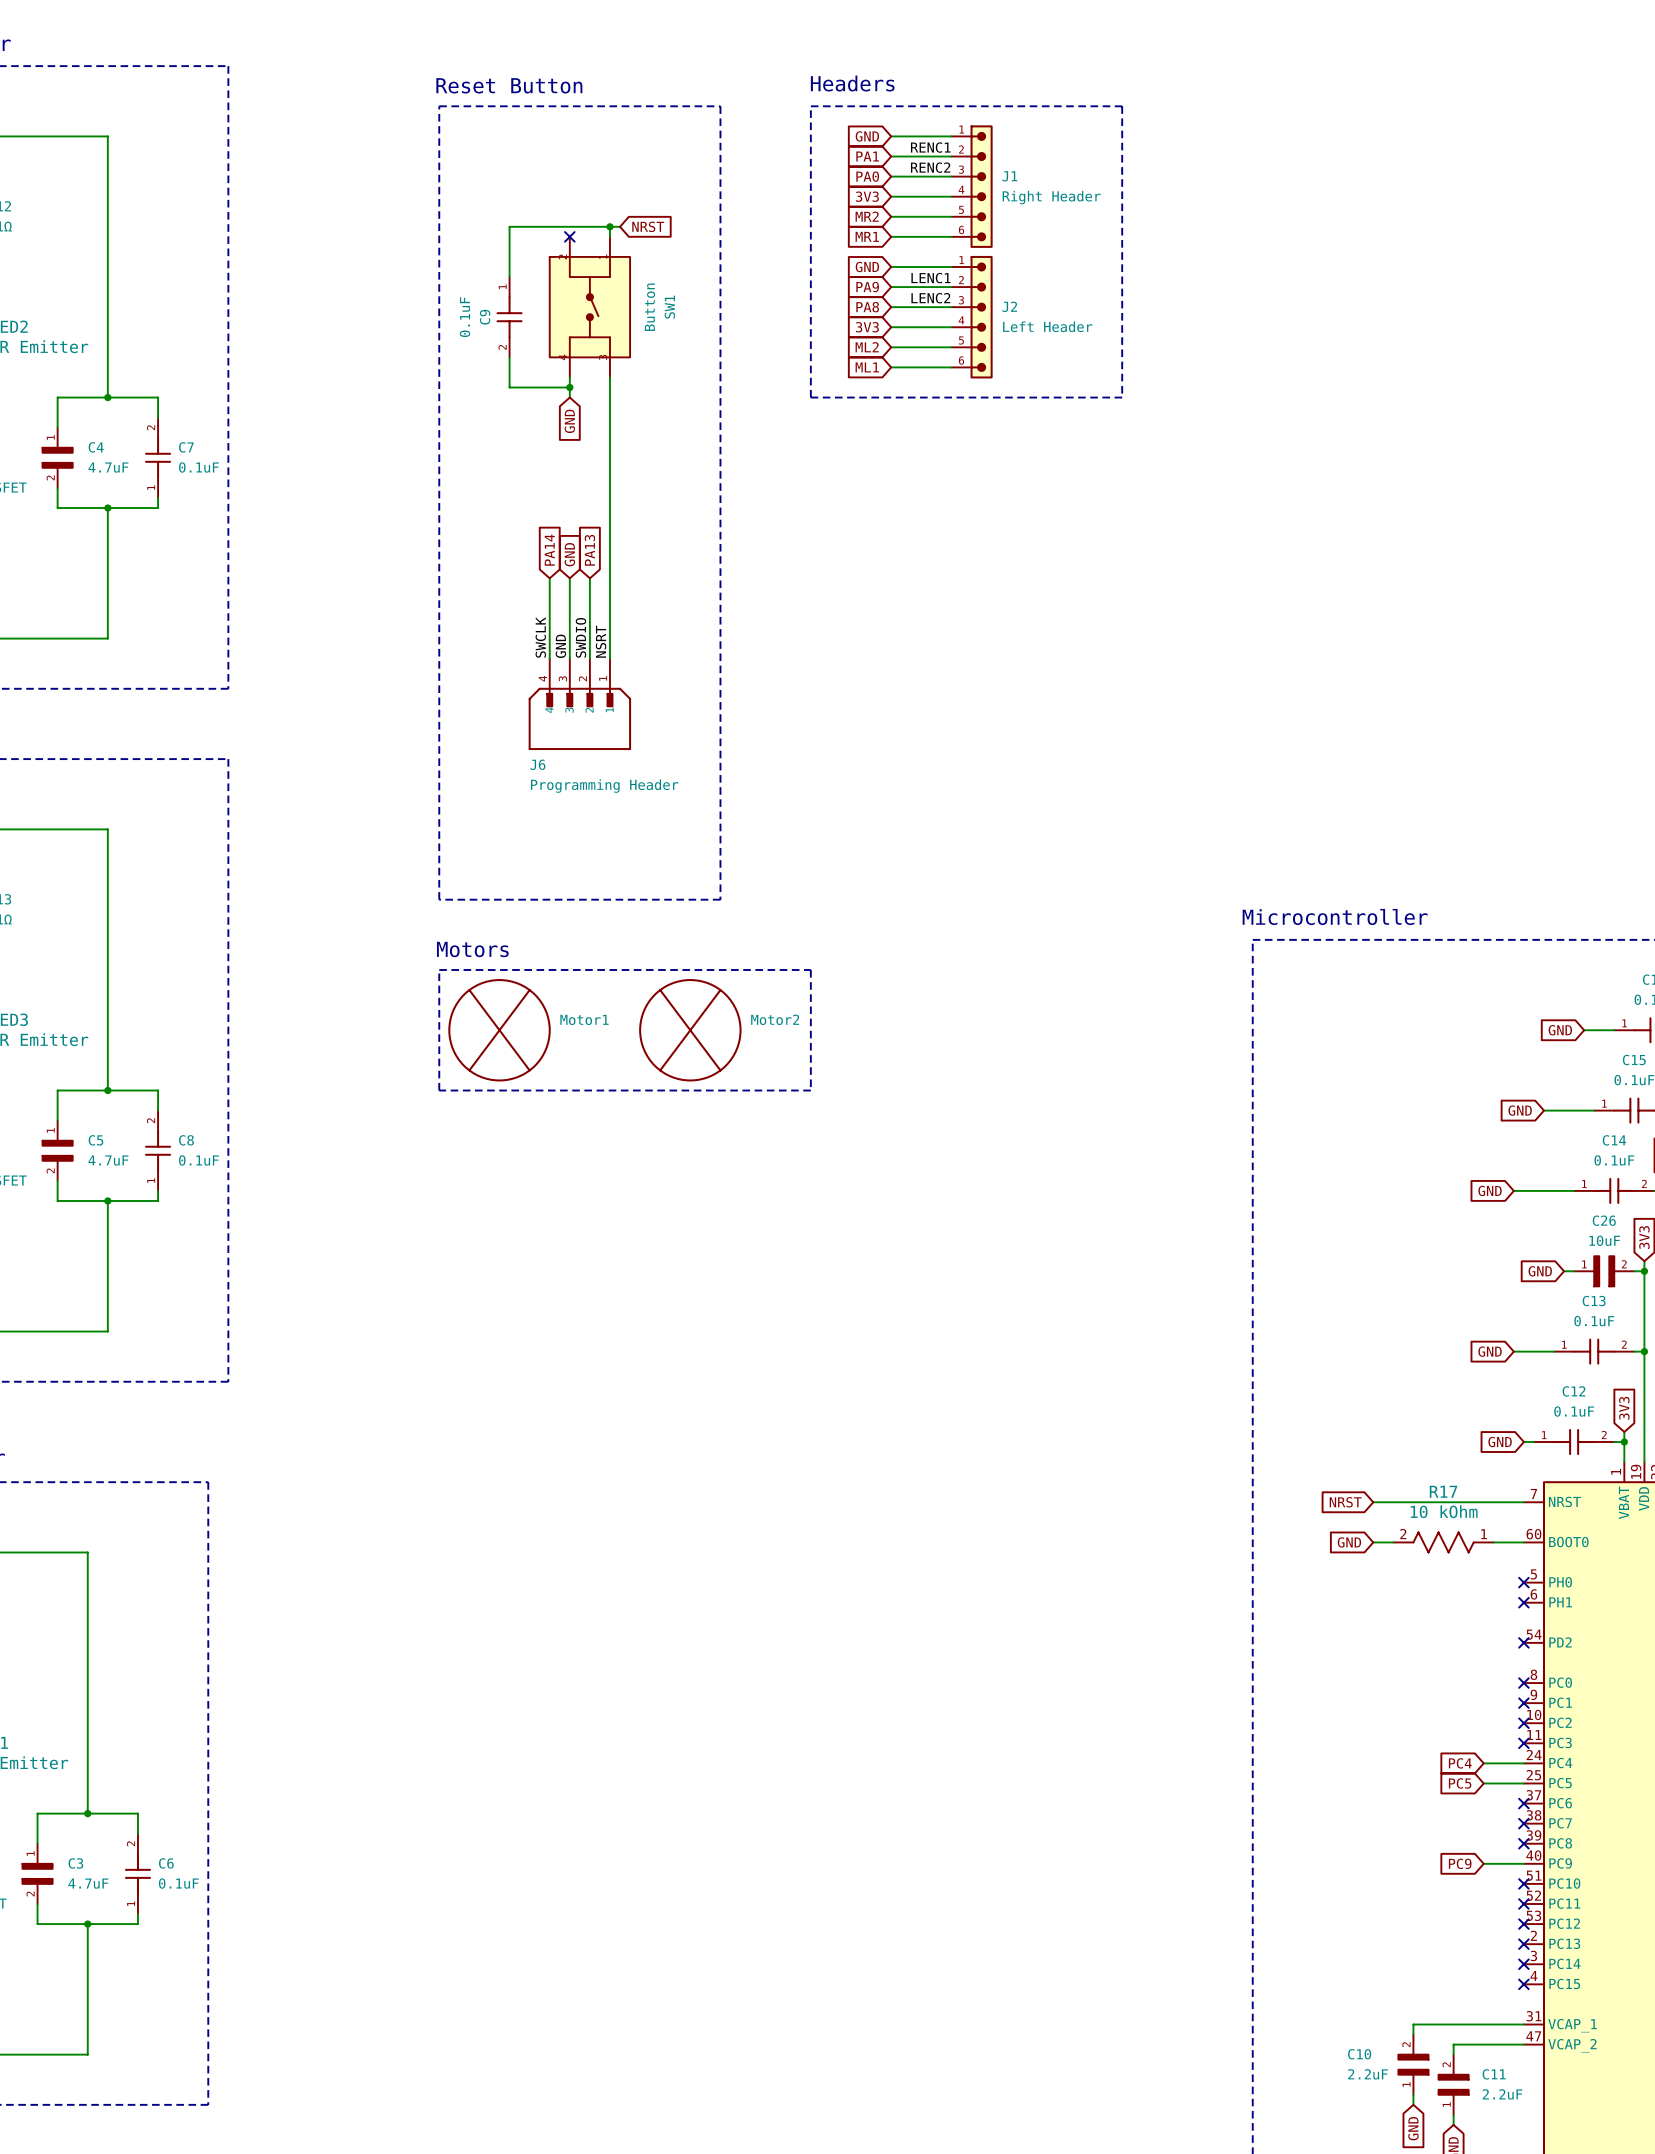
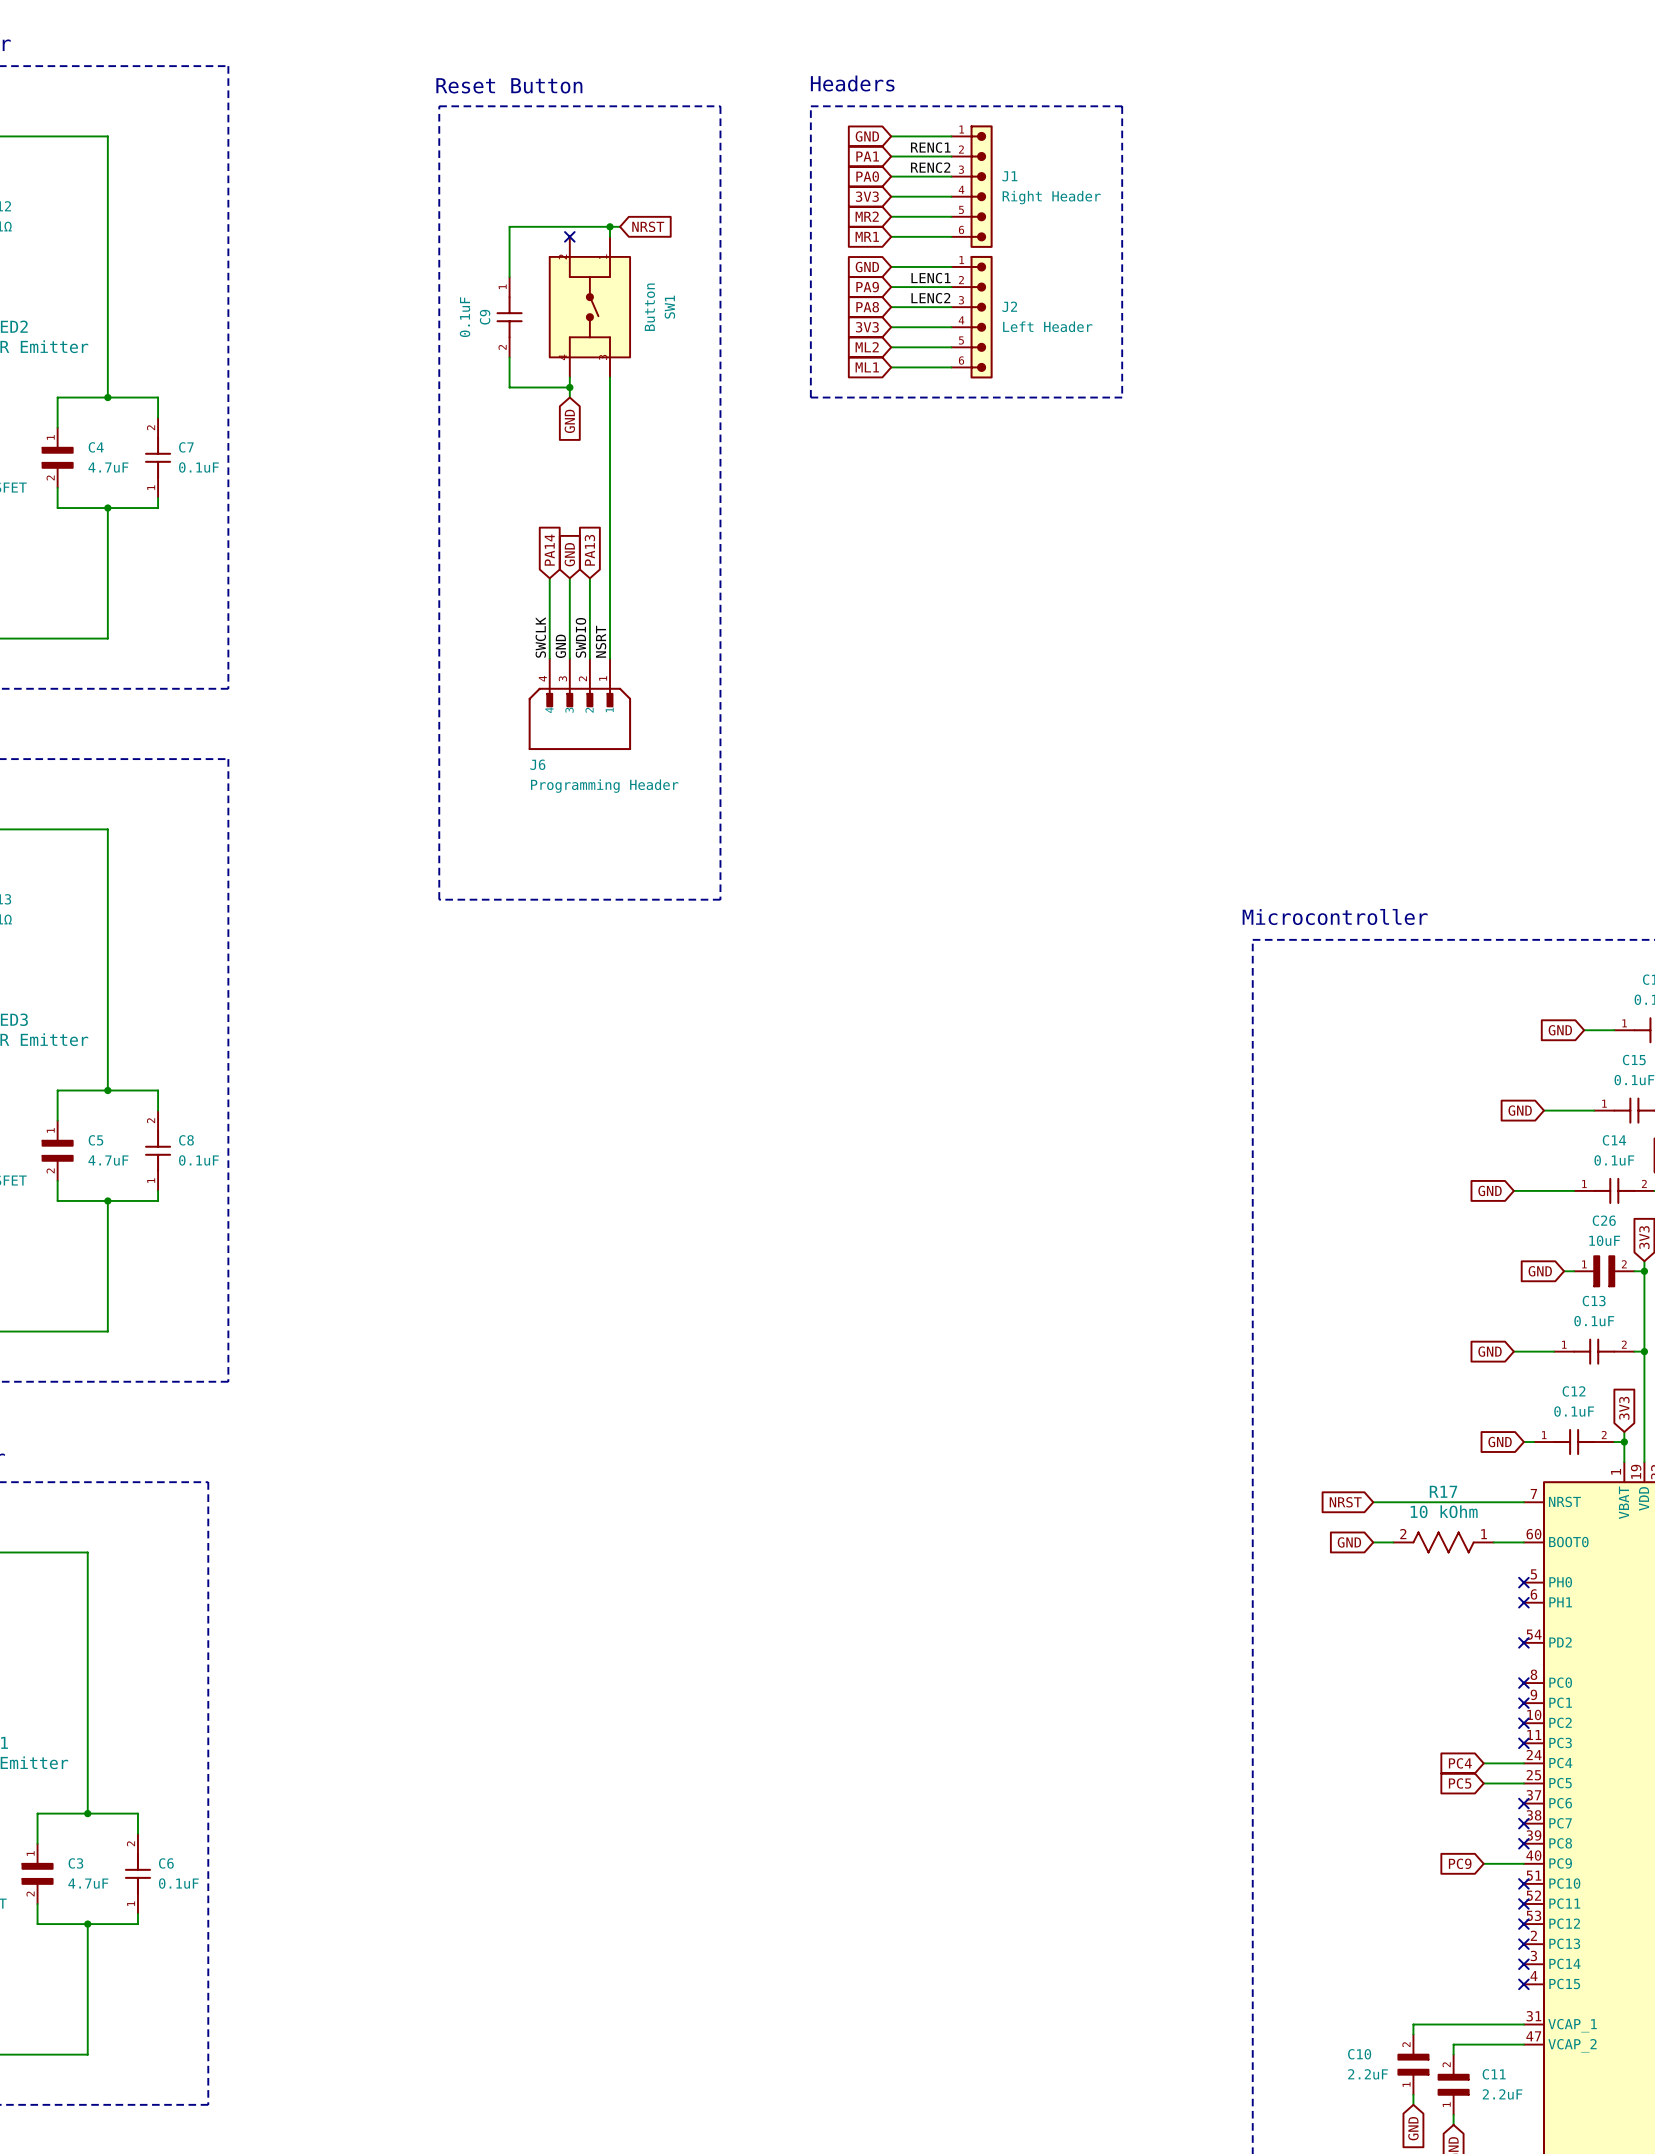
text: Motors (472, 949) -> none
line: (439, 969) (810, 969) (810, 1090) (439, 1090) (439, 969) -> none
Motor1: (499, 1030) -> none
Motor2: (690, 1030) -> none

